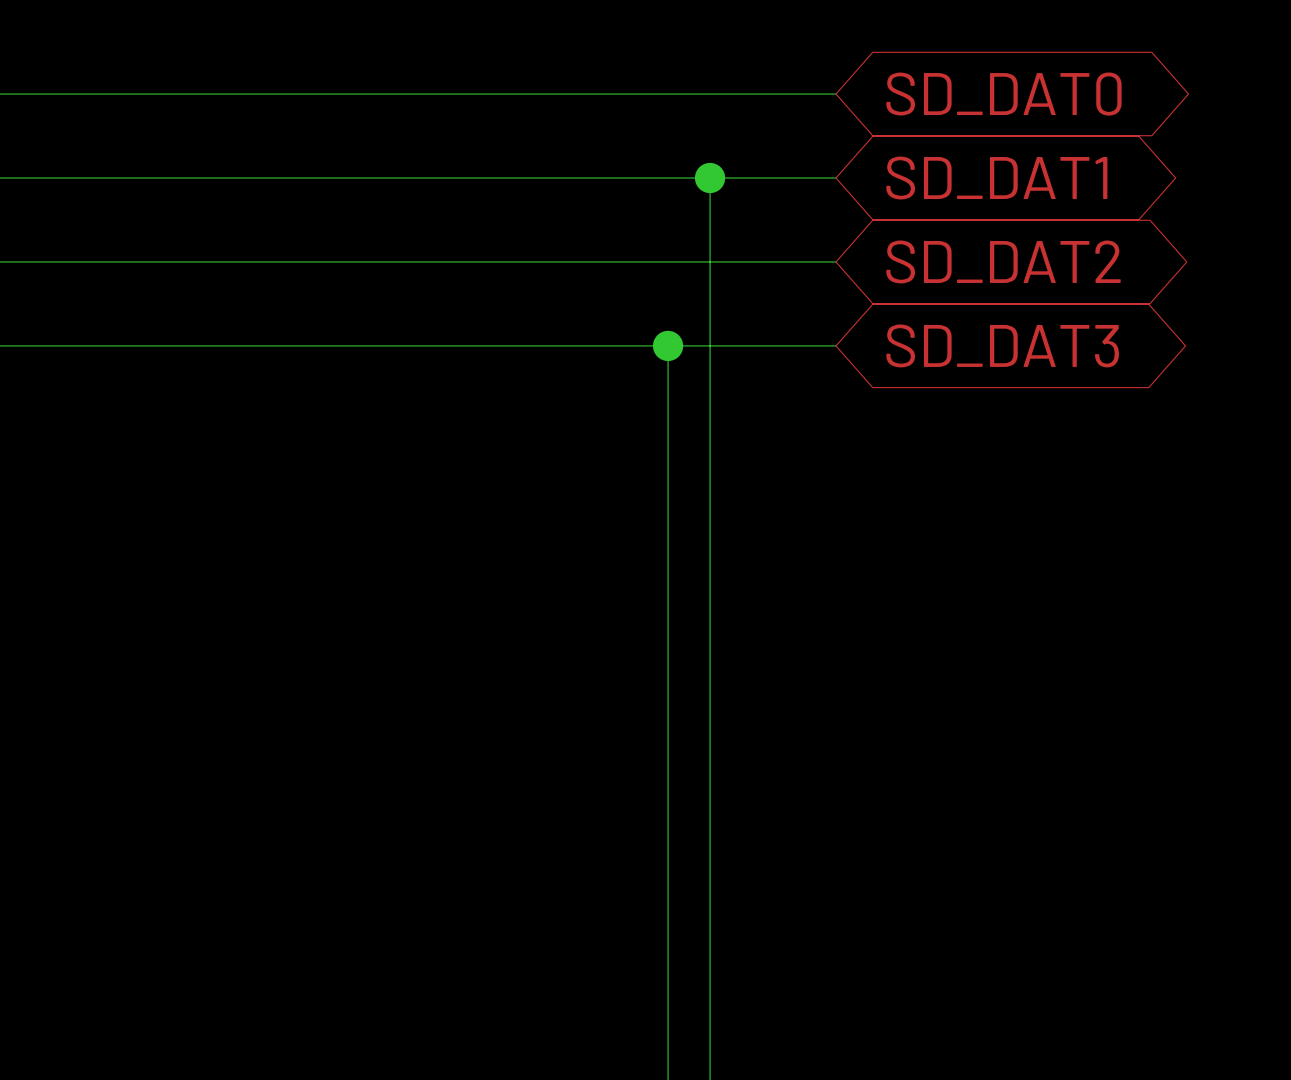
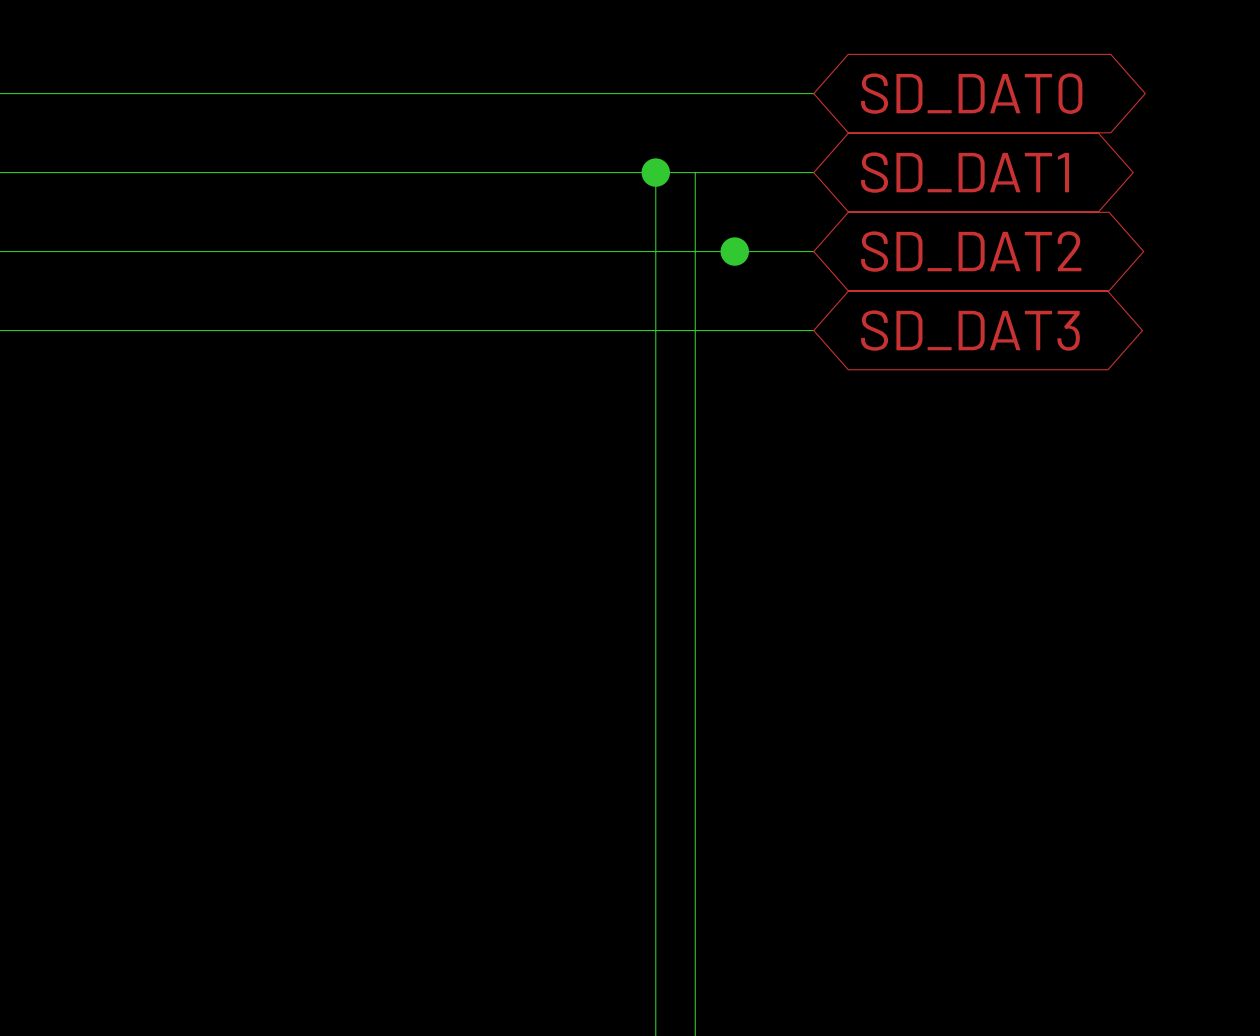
wire: none -> (655, 172) (655, 330)
junction position: (710, 178) -> (655, 172)
junction: none -> (734, 251)
junction: (668, 345) -> none

